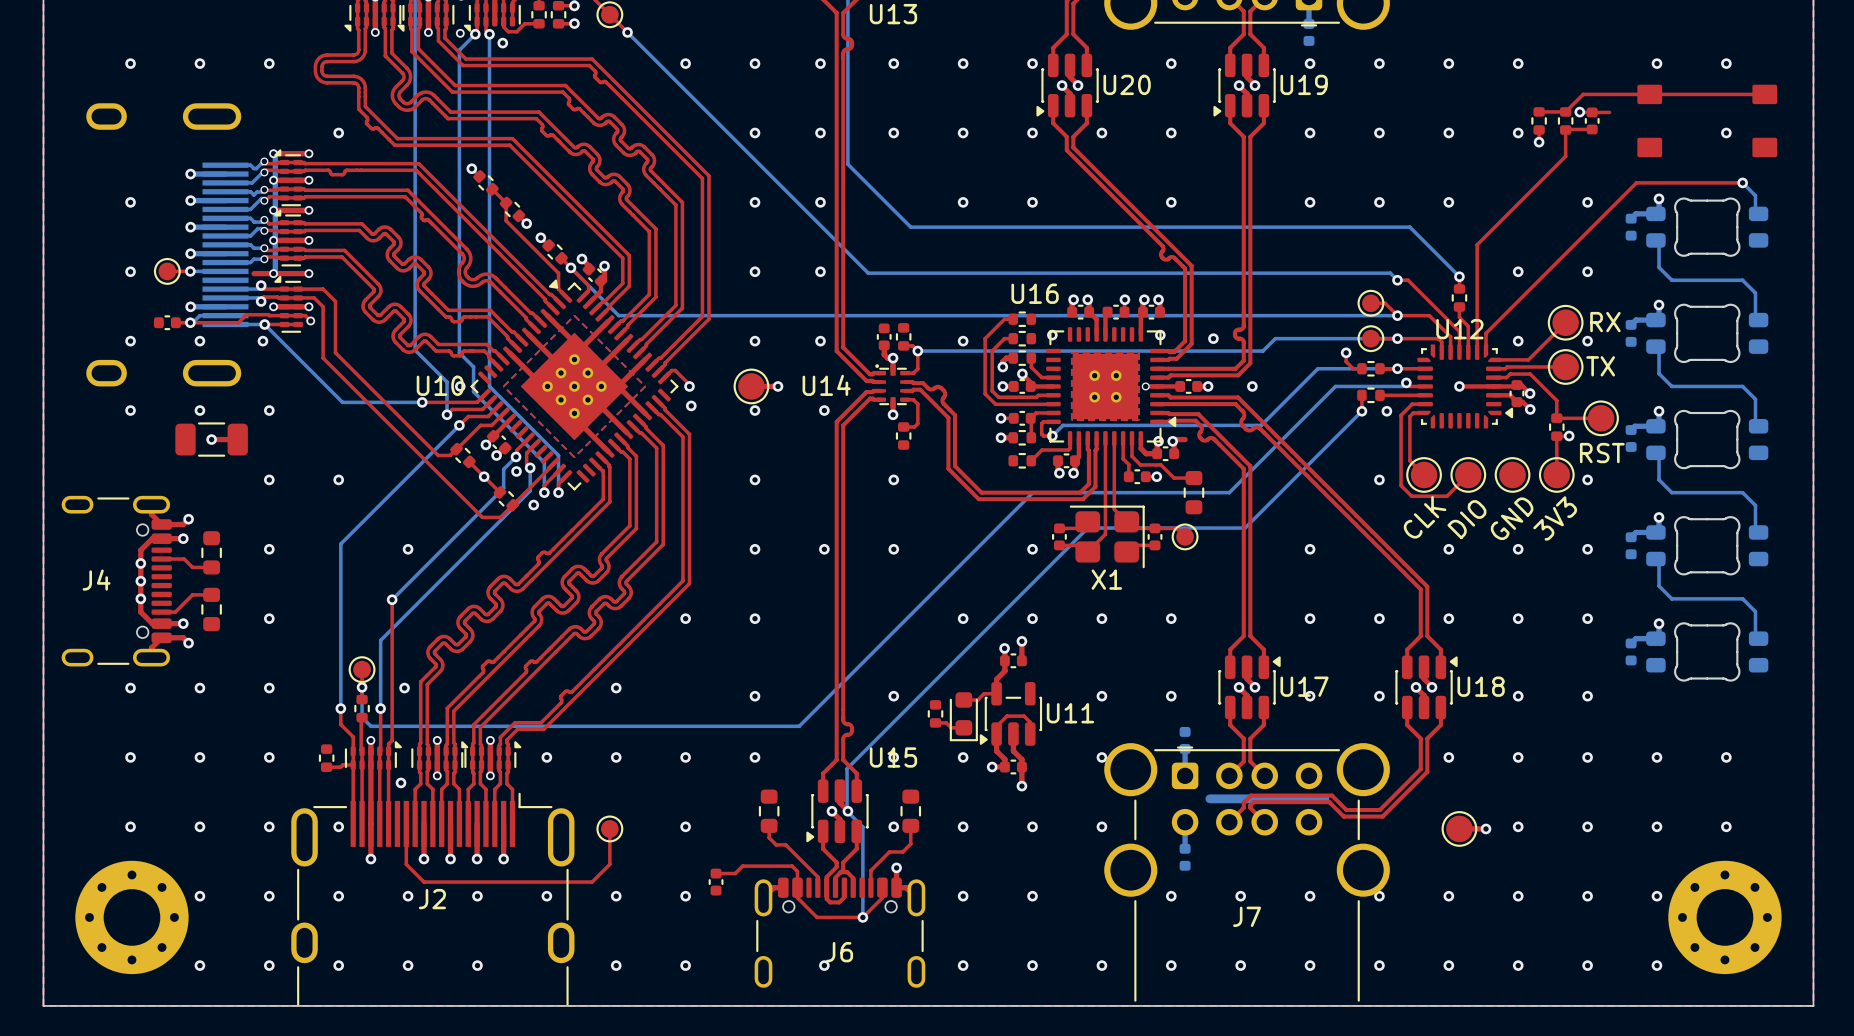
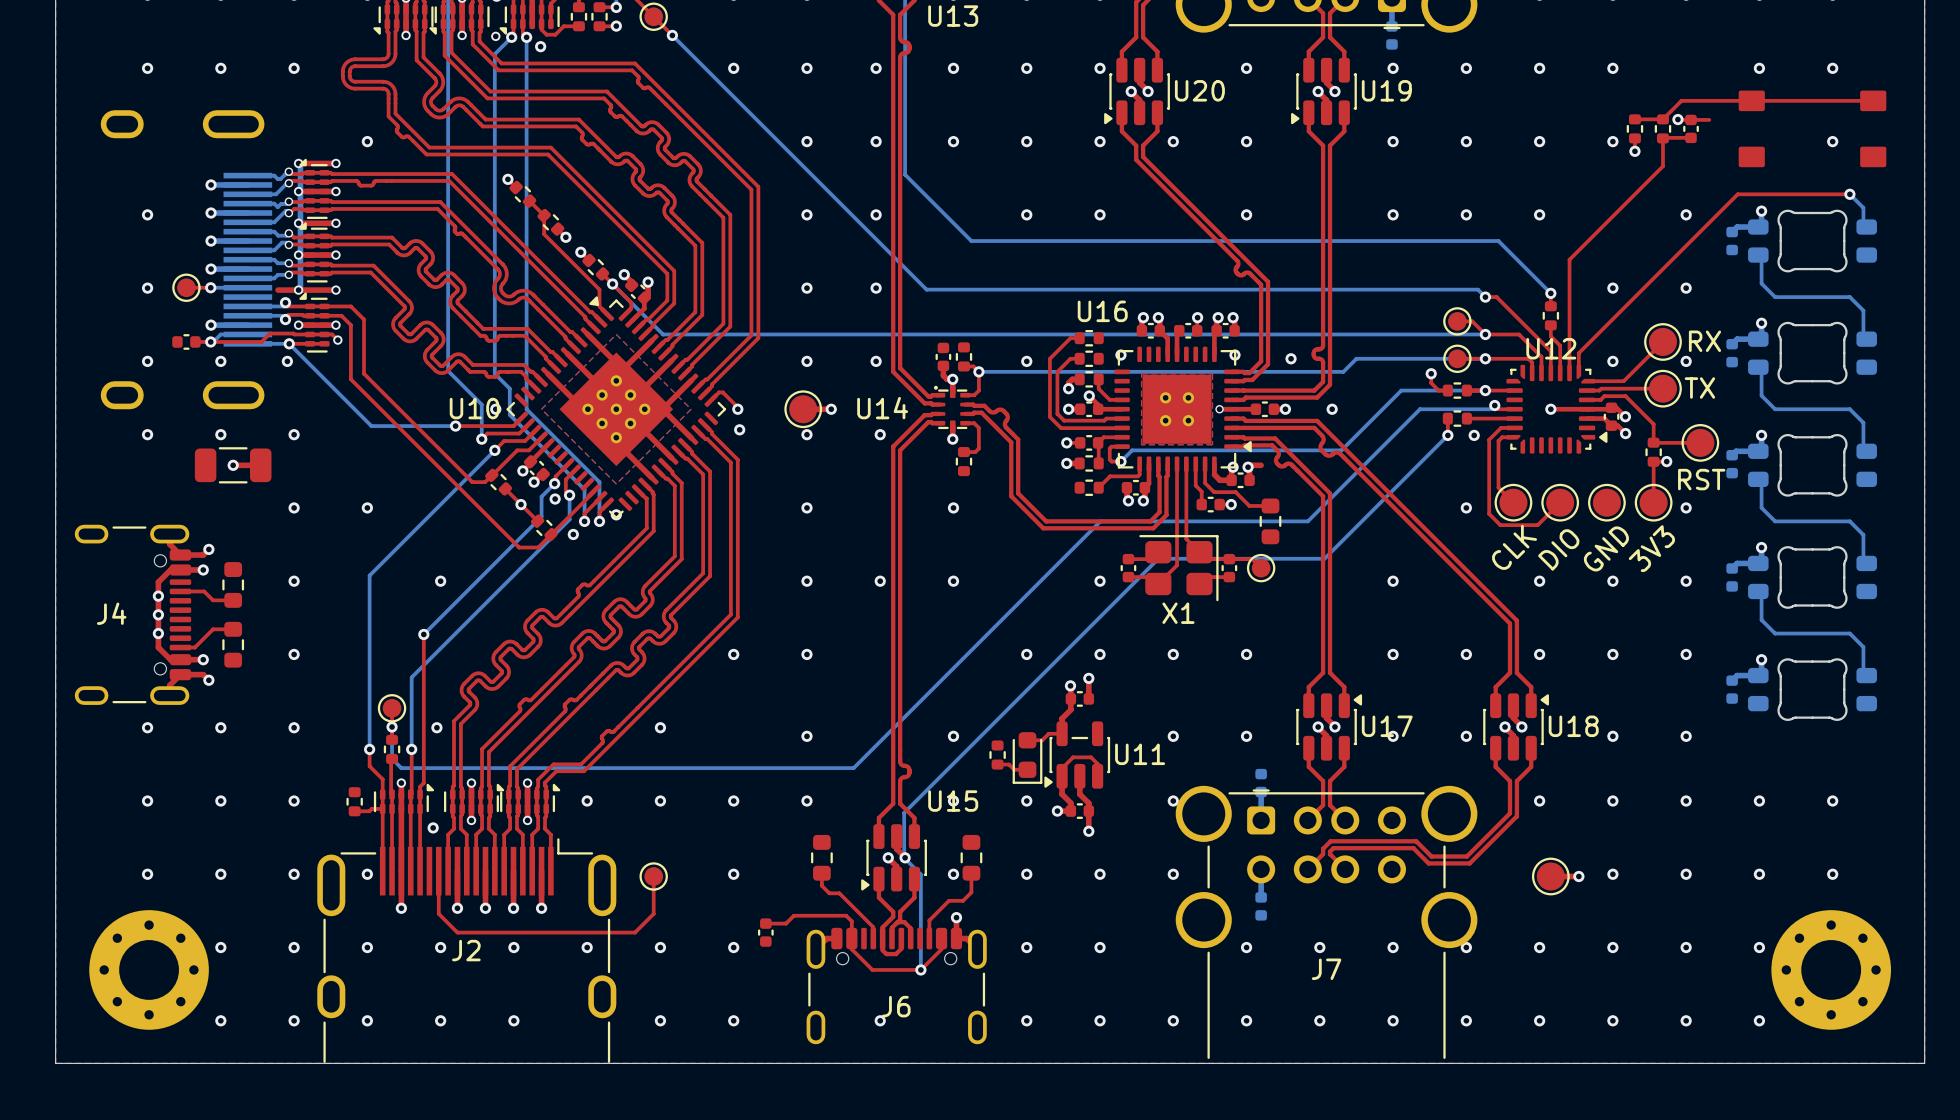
via: none -> (616, 514)
bottom track: (1209, 798) (1324, 798) -> none

